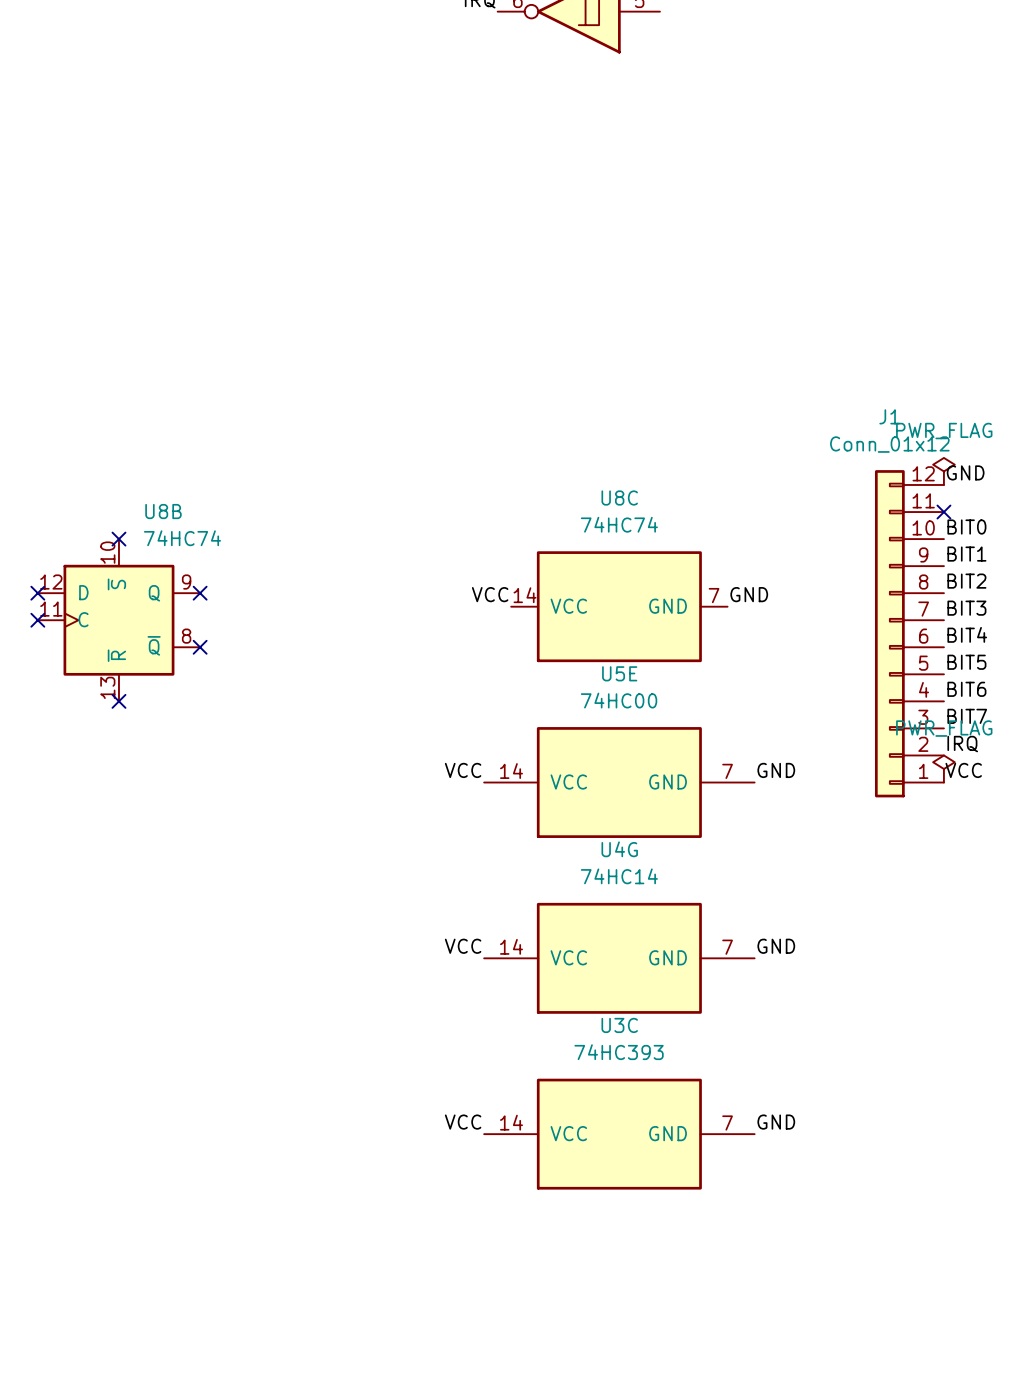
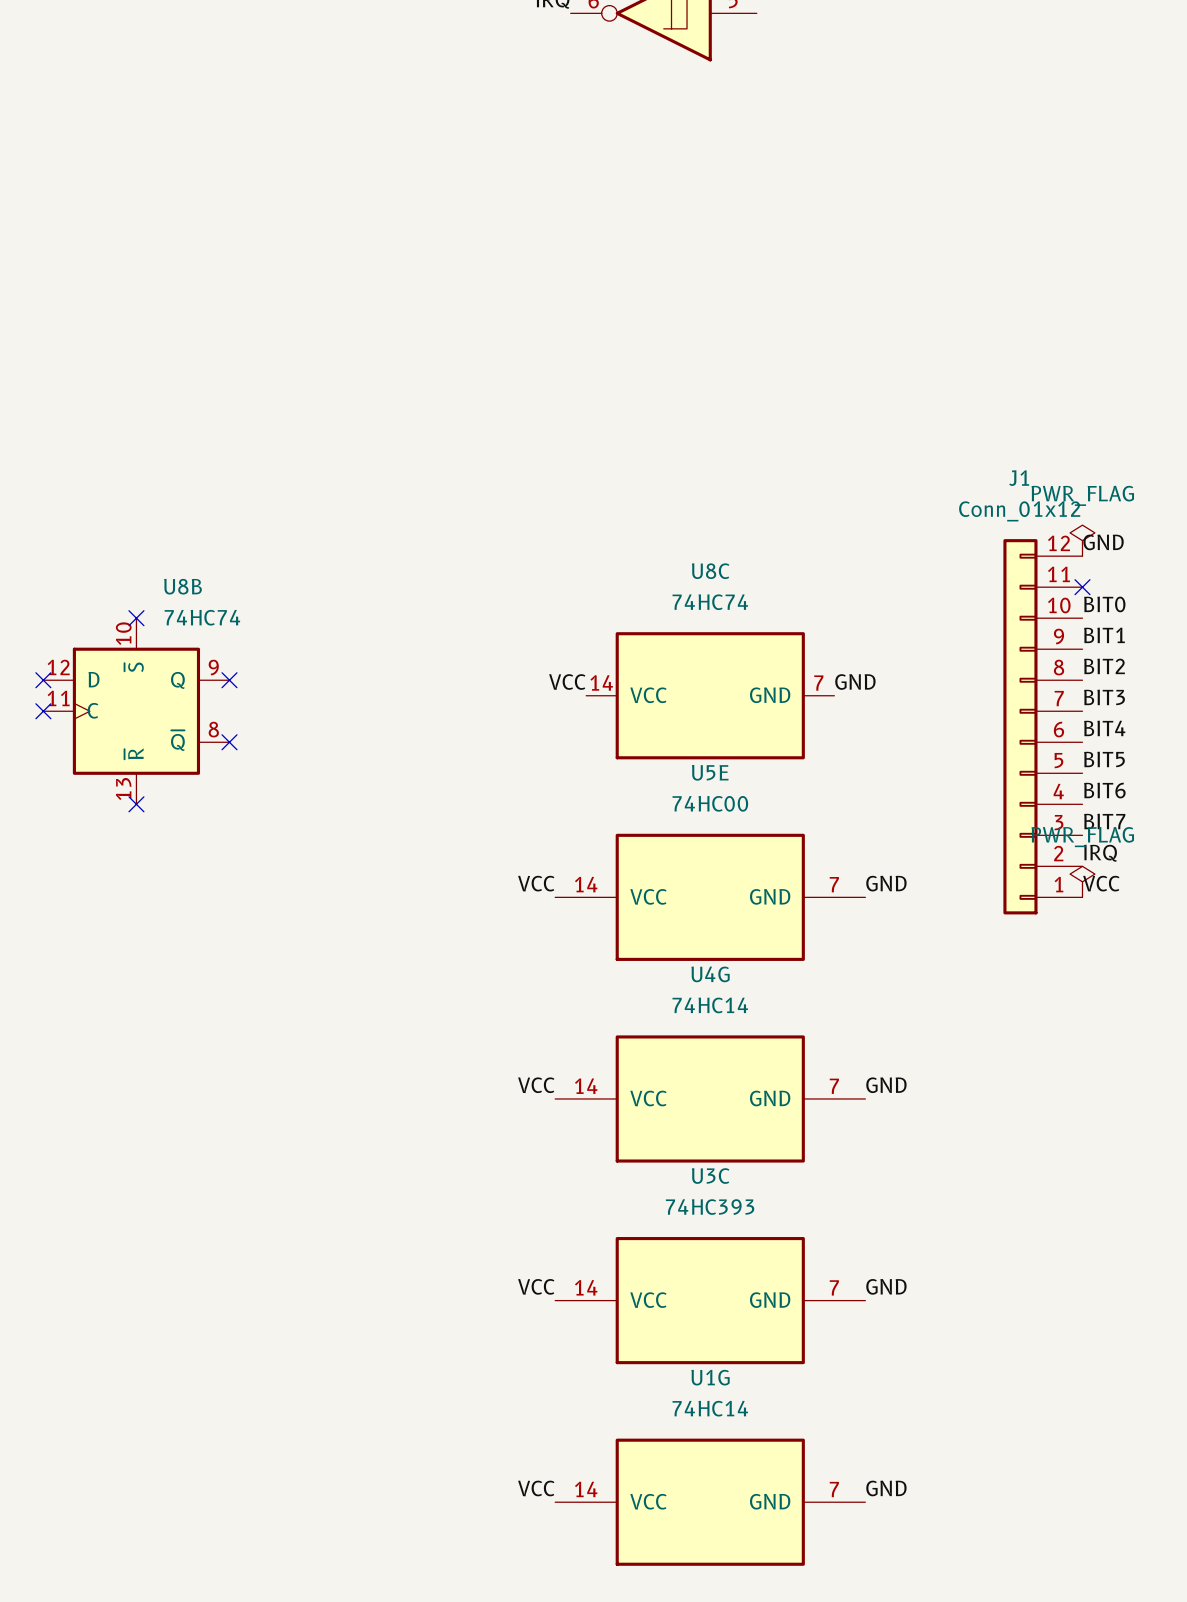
label: none -> VCC (536, 1488)
label: none -> GND (886, 1488)
U1G: none -> 74HC14 (710, 1502)

